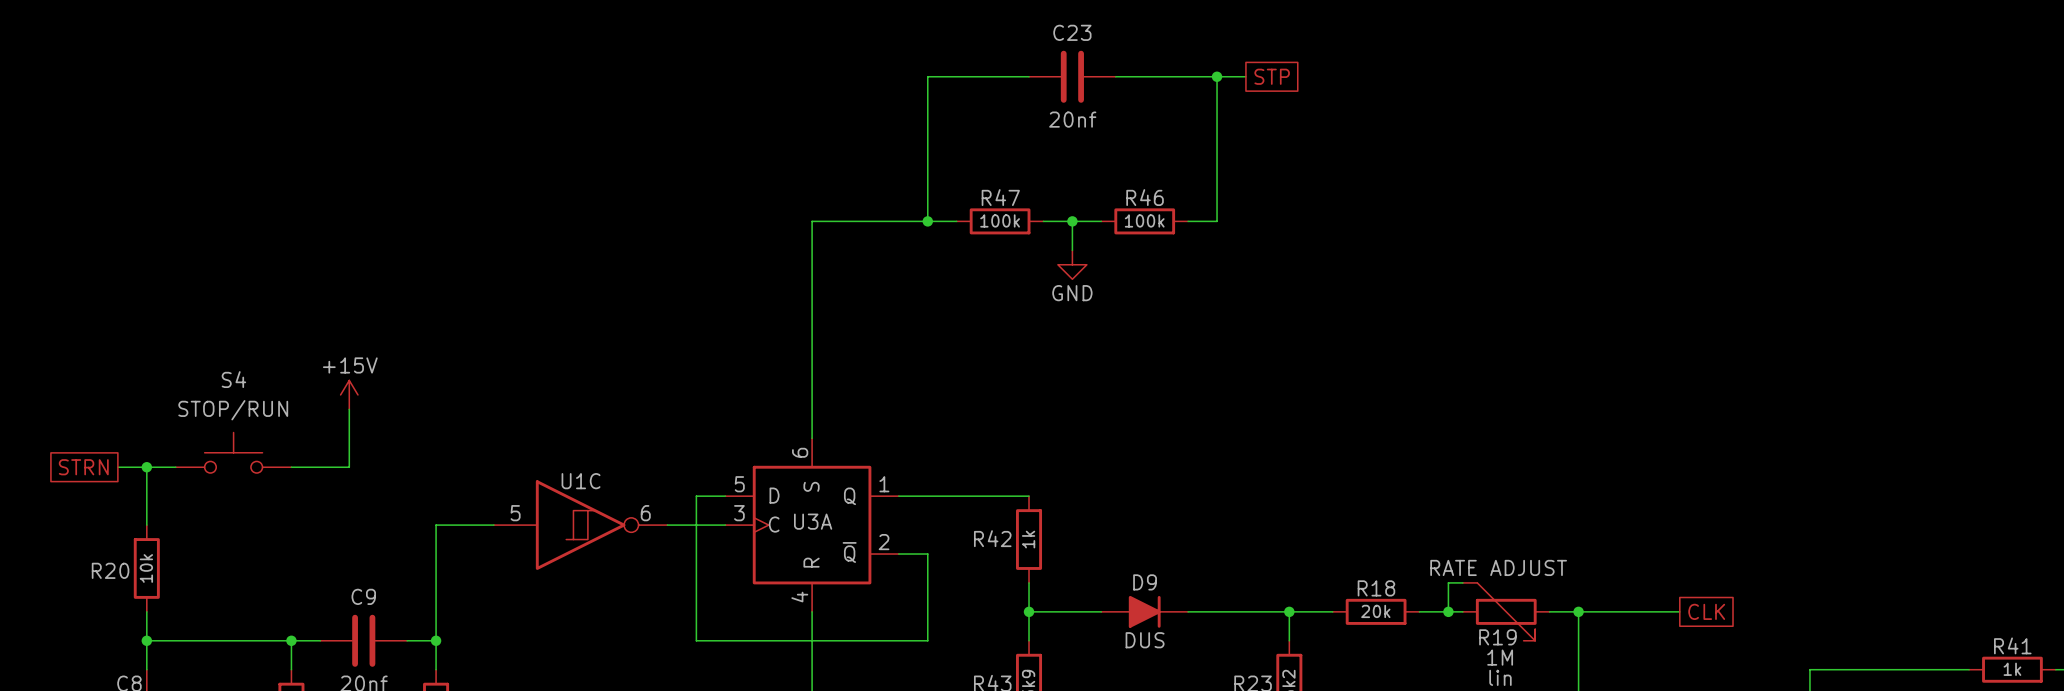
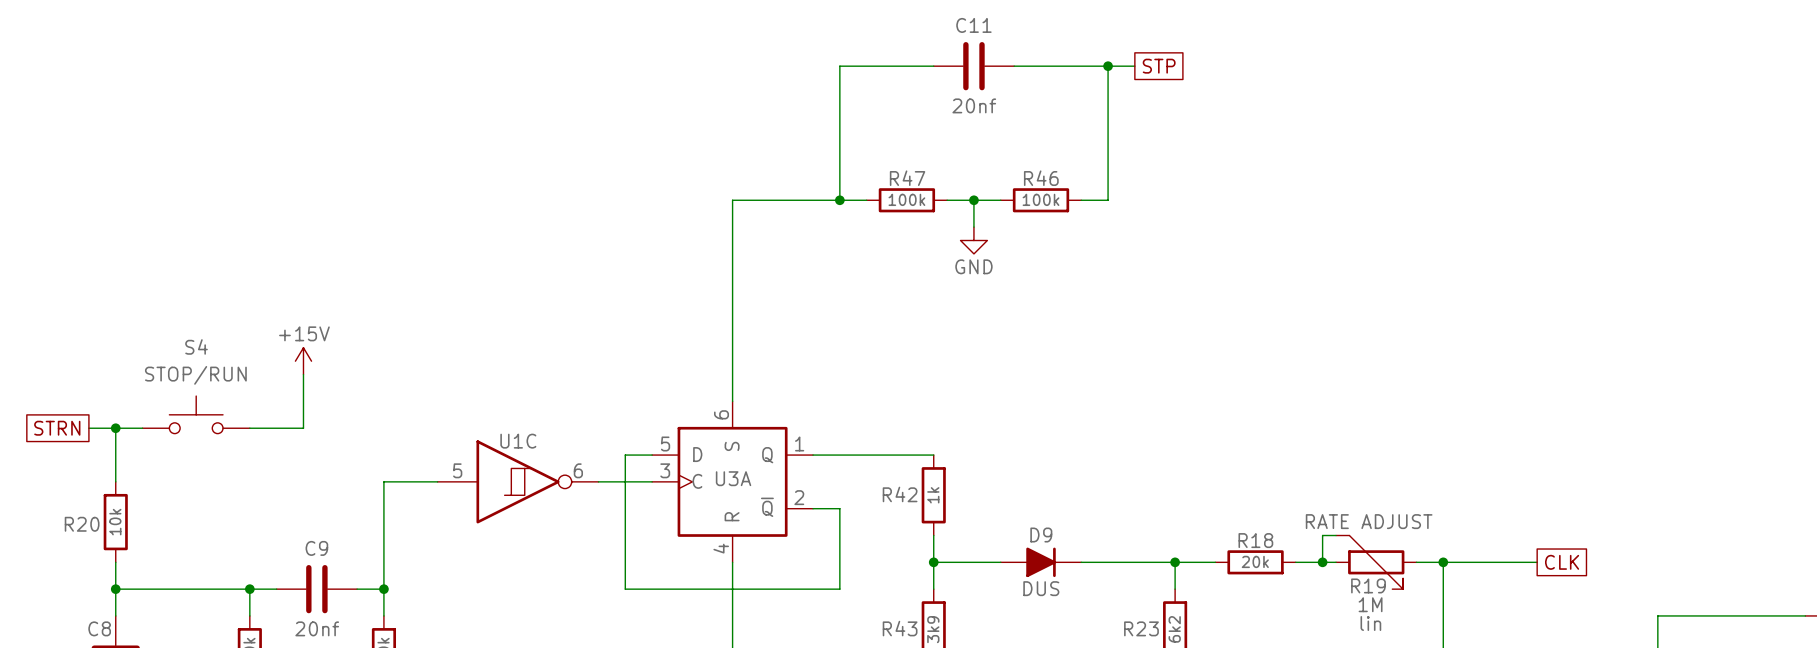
C23 name: C23 (1072, 32) -> C11 (973, 25)

